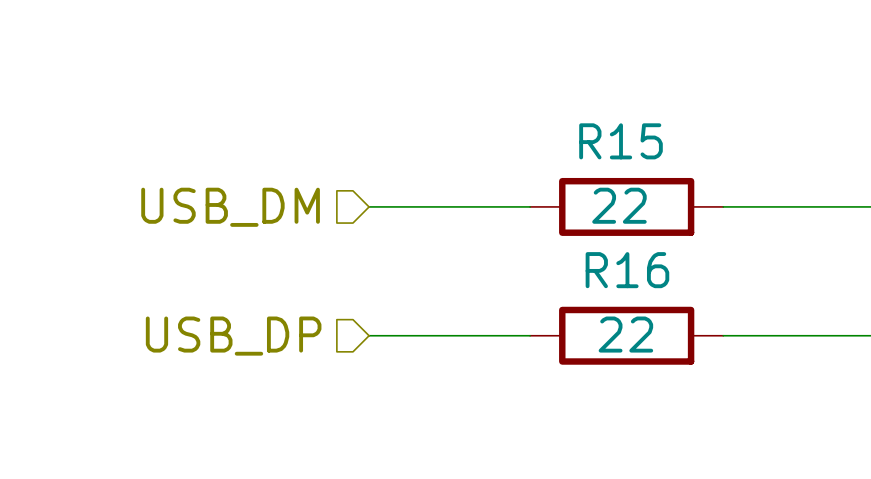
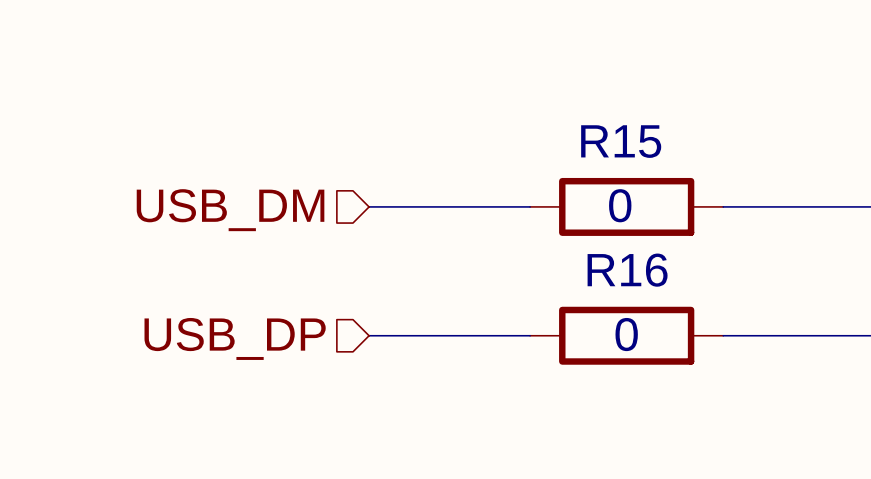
R15 value: 22 (619, 205) -> 0 (620, 205)
R16 value: 22 (625, 334) -> 0 (626, 334)

